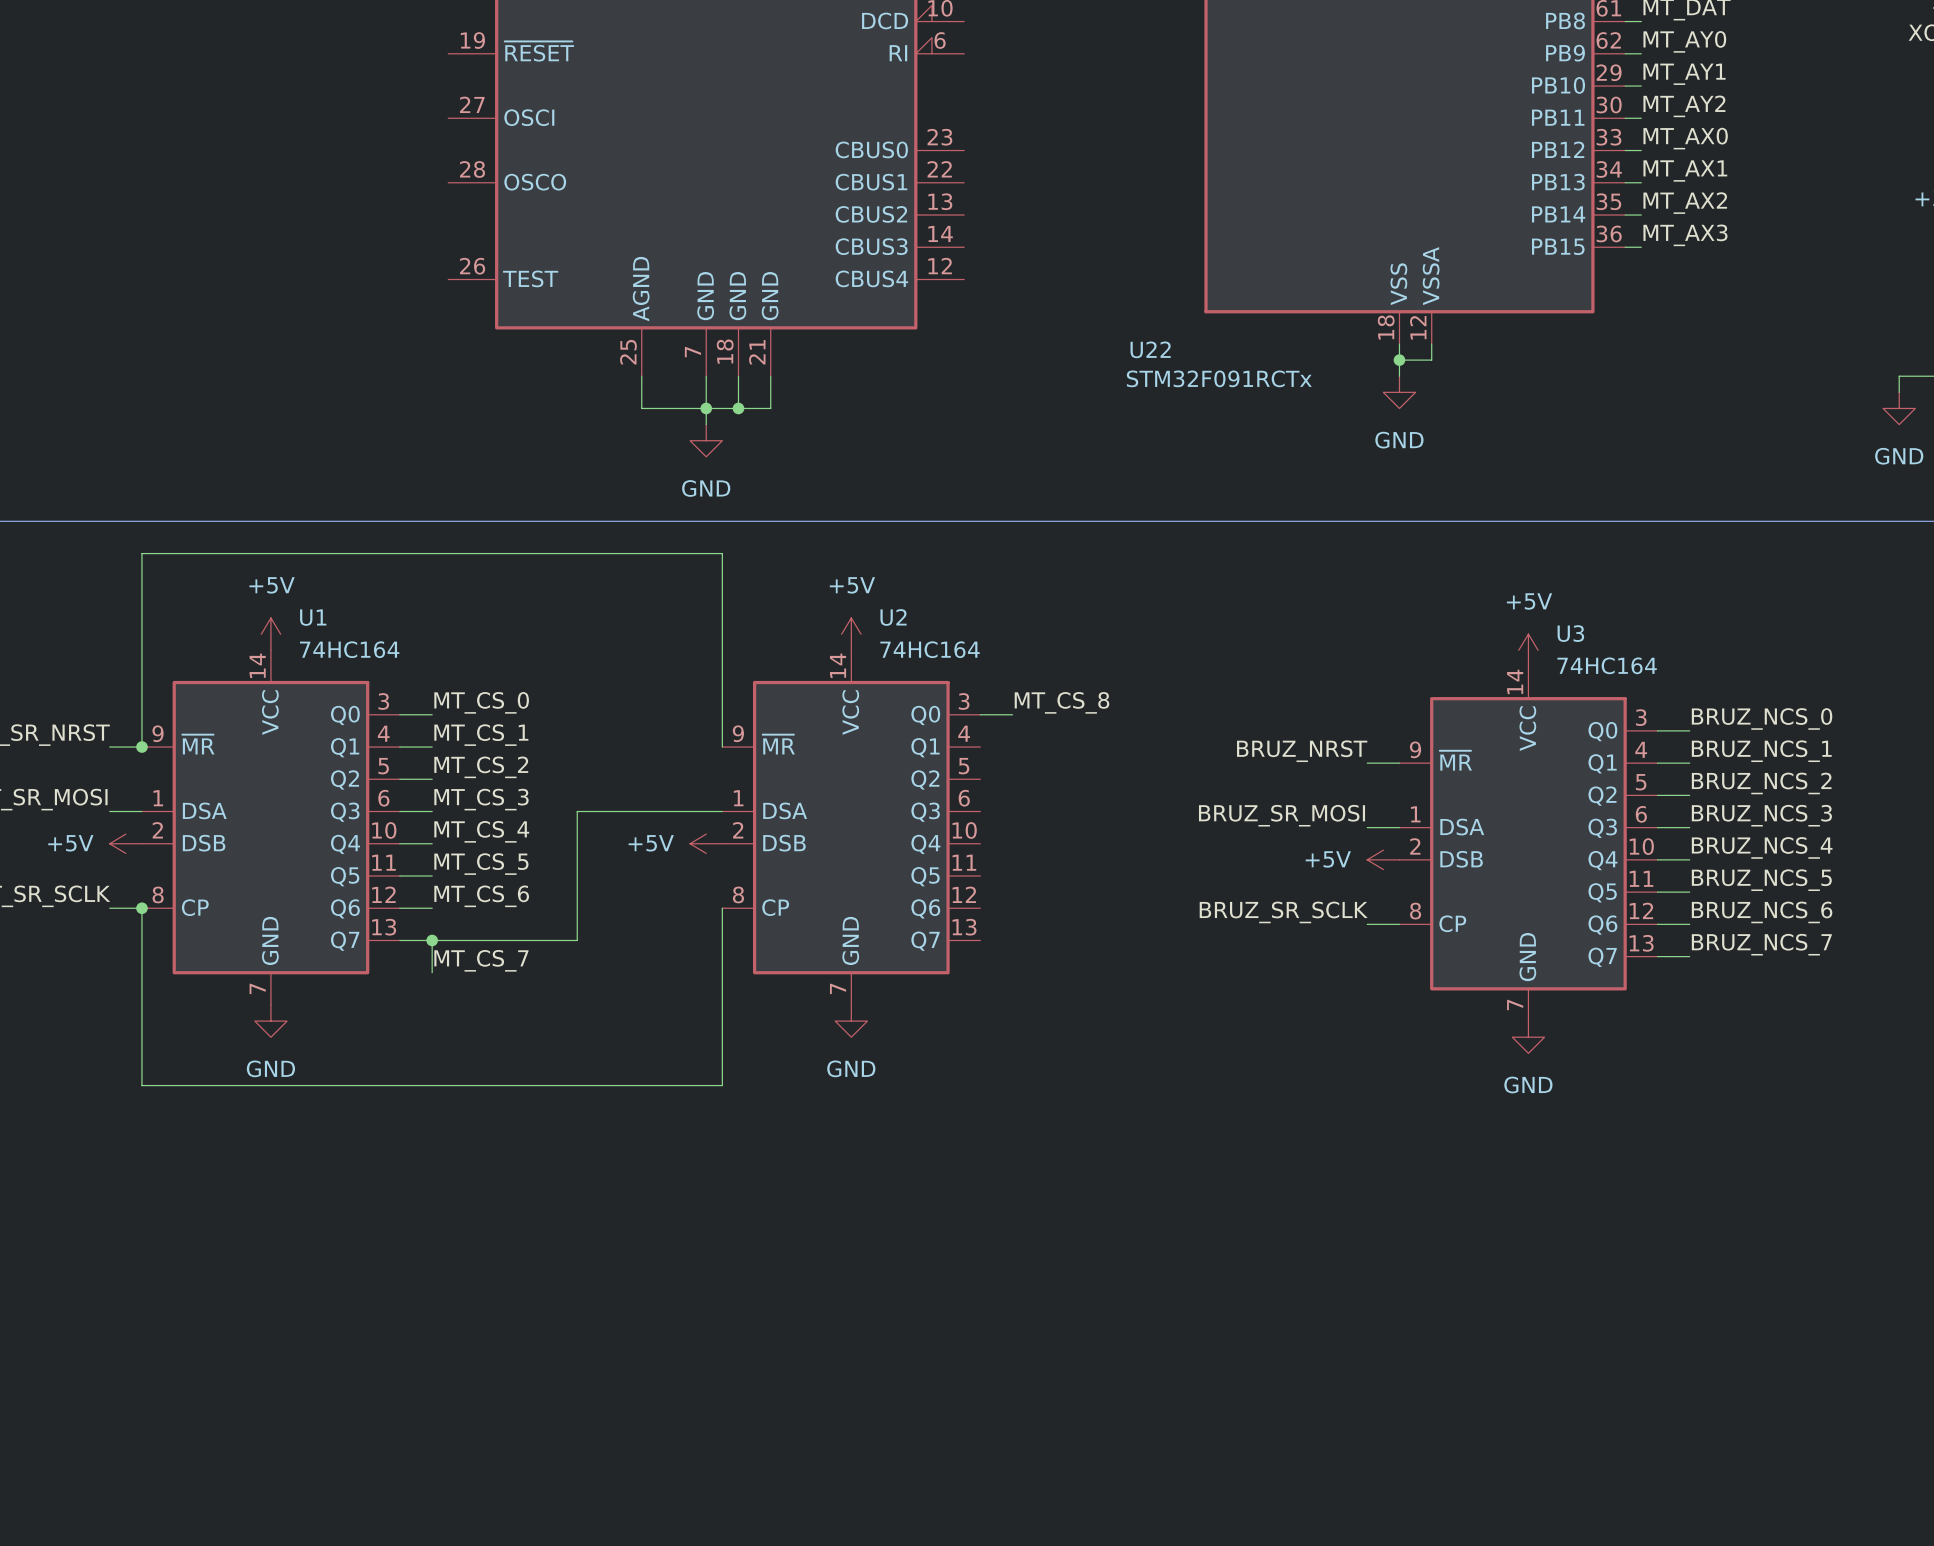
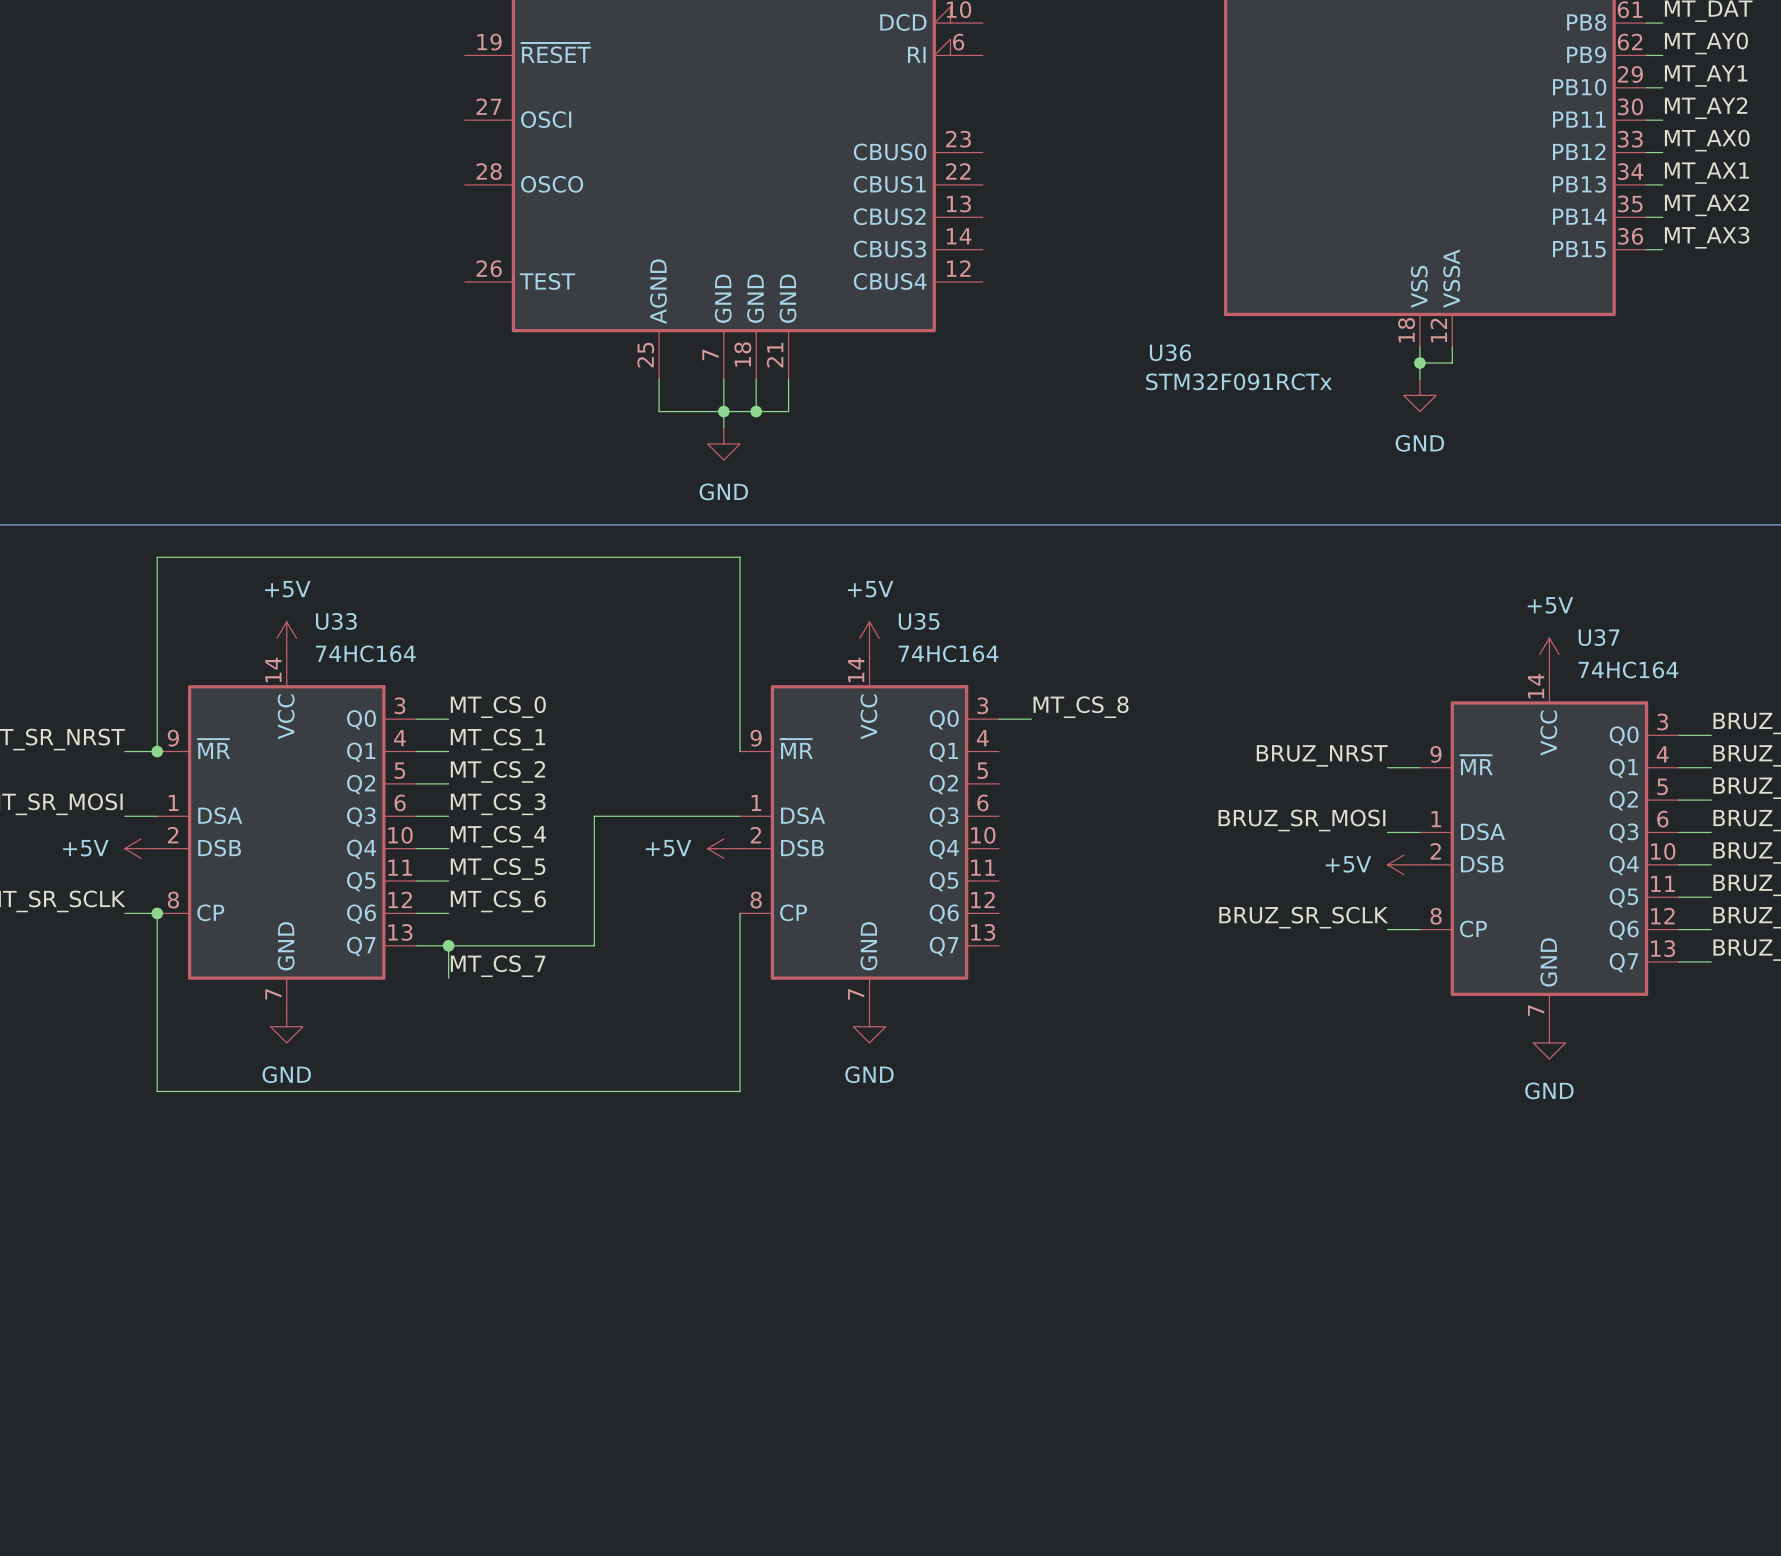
U22 name: U22 (1150, 349) -> U36 (1170, 352)
U1 name: U1 (313, 617) -> U33 (336, 621)
U2 name: U2 (893, 617) -> U35 (919, 621)
U3 name: U3 (1570, 633) -> U37 (1599, 637)

